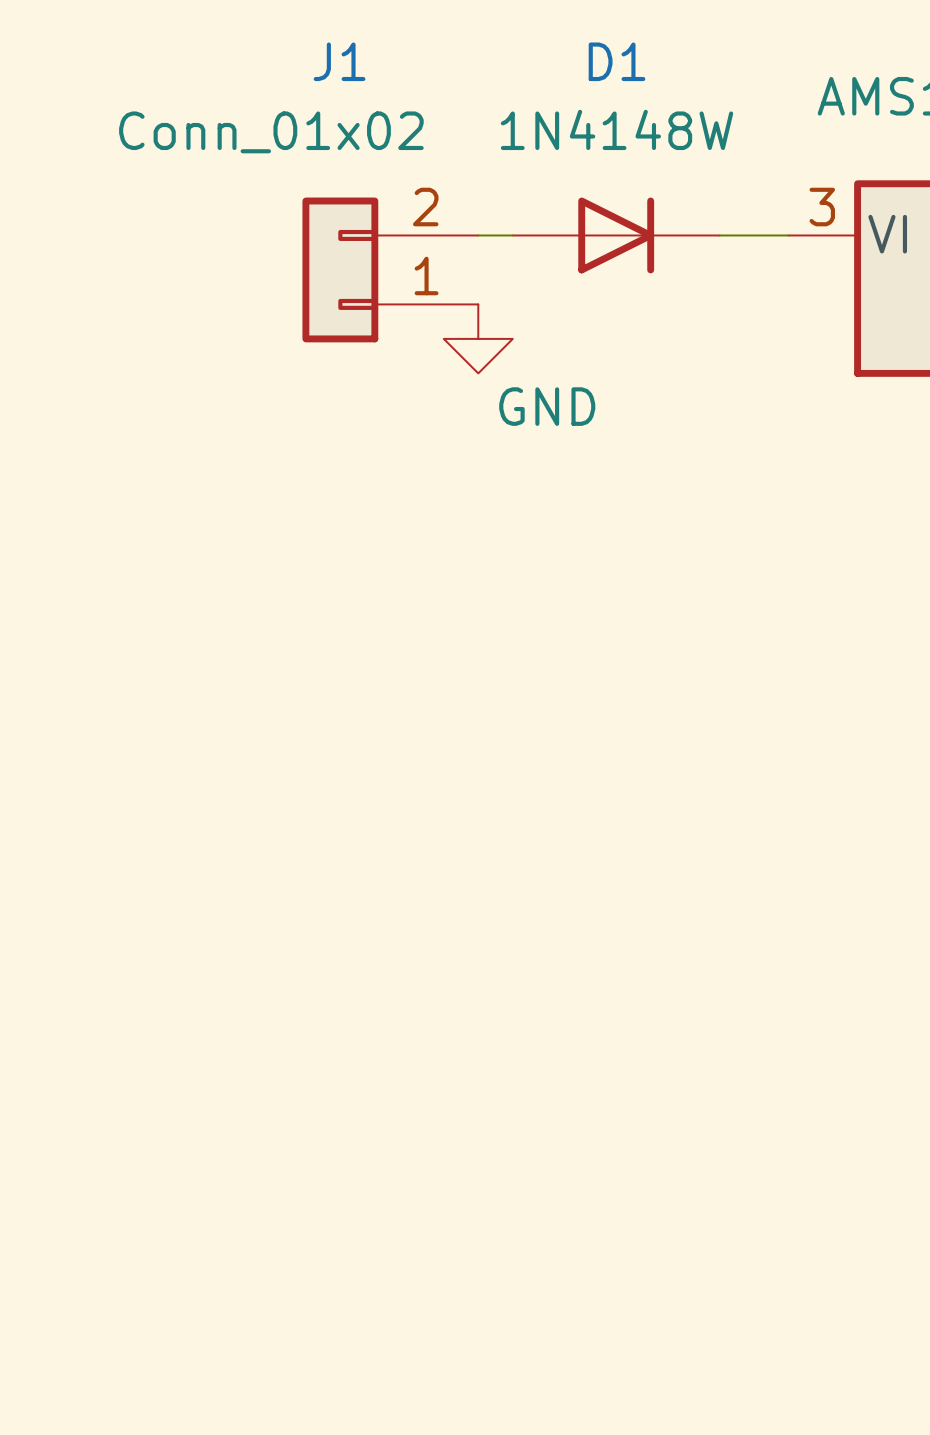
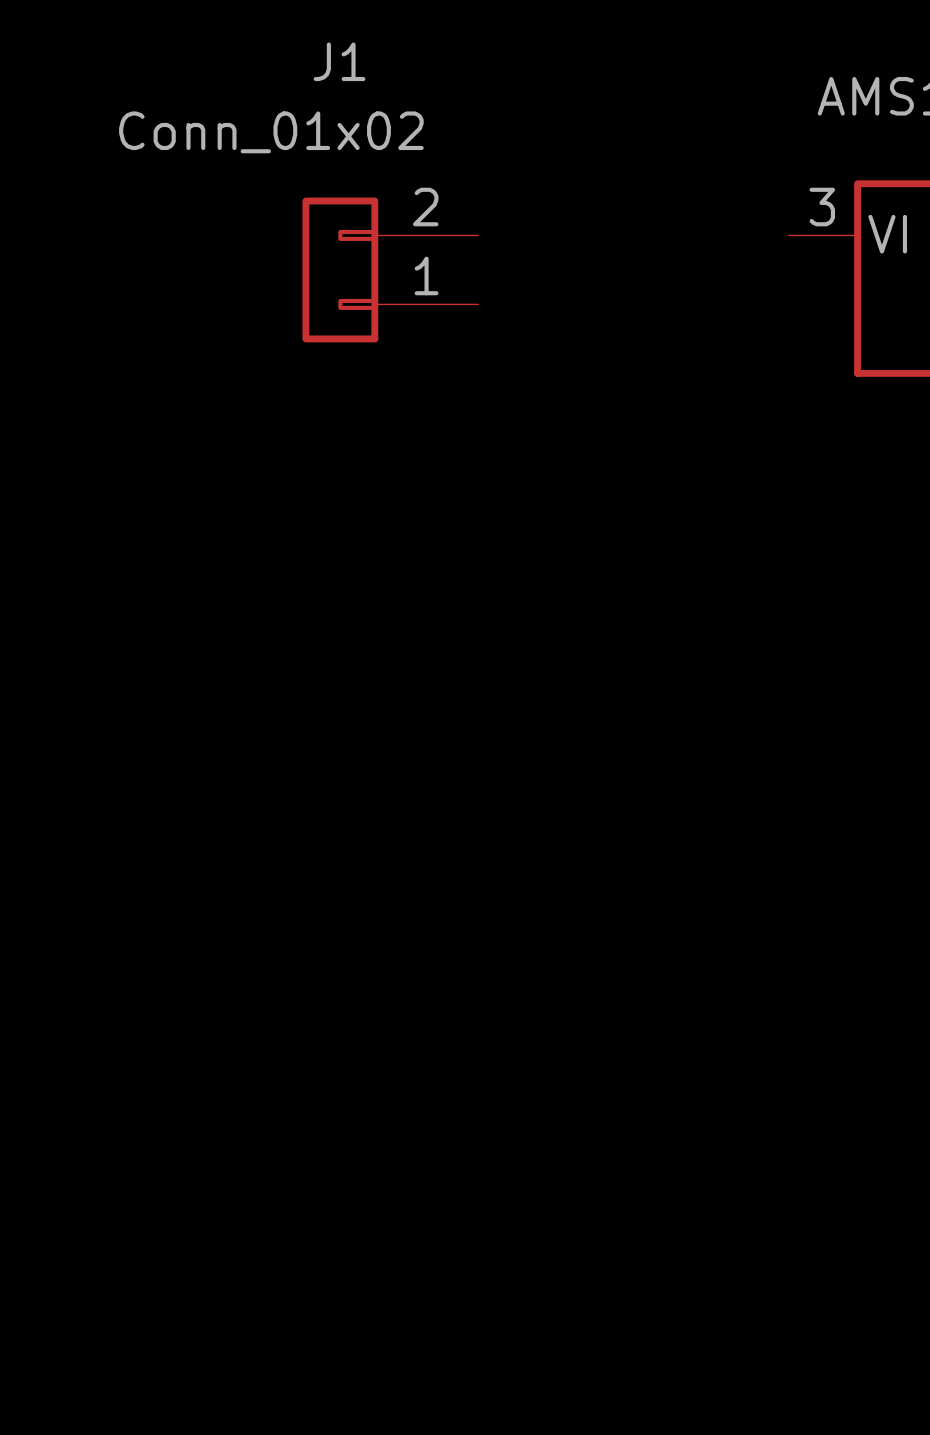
wire: (478, 235) (512, 235) -> none
D1: 1N4148W (616, 235) -> none
wire: (719, 235) (788, 235) -> none
power symbol: GND (478, 338) -> none

